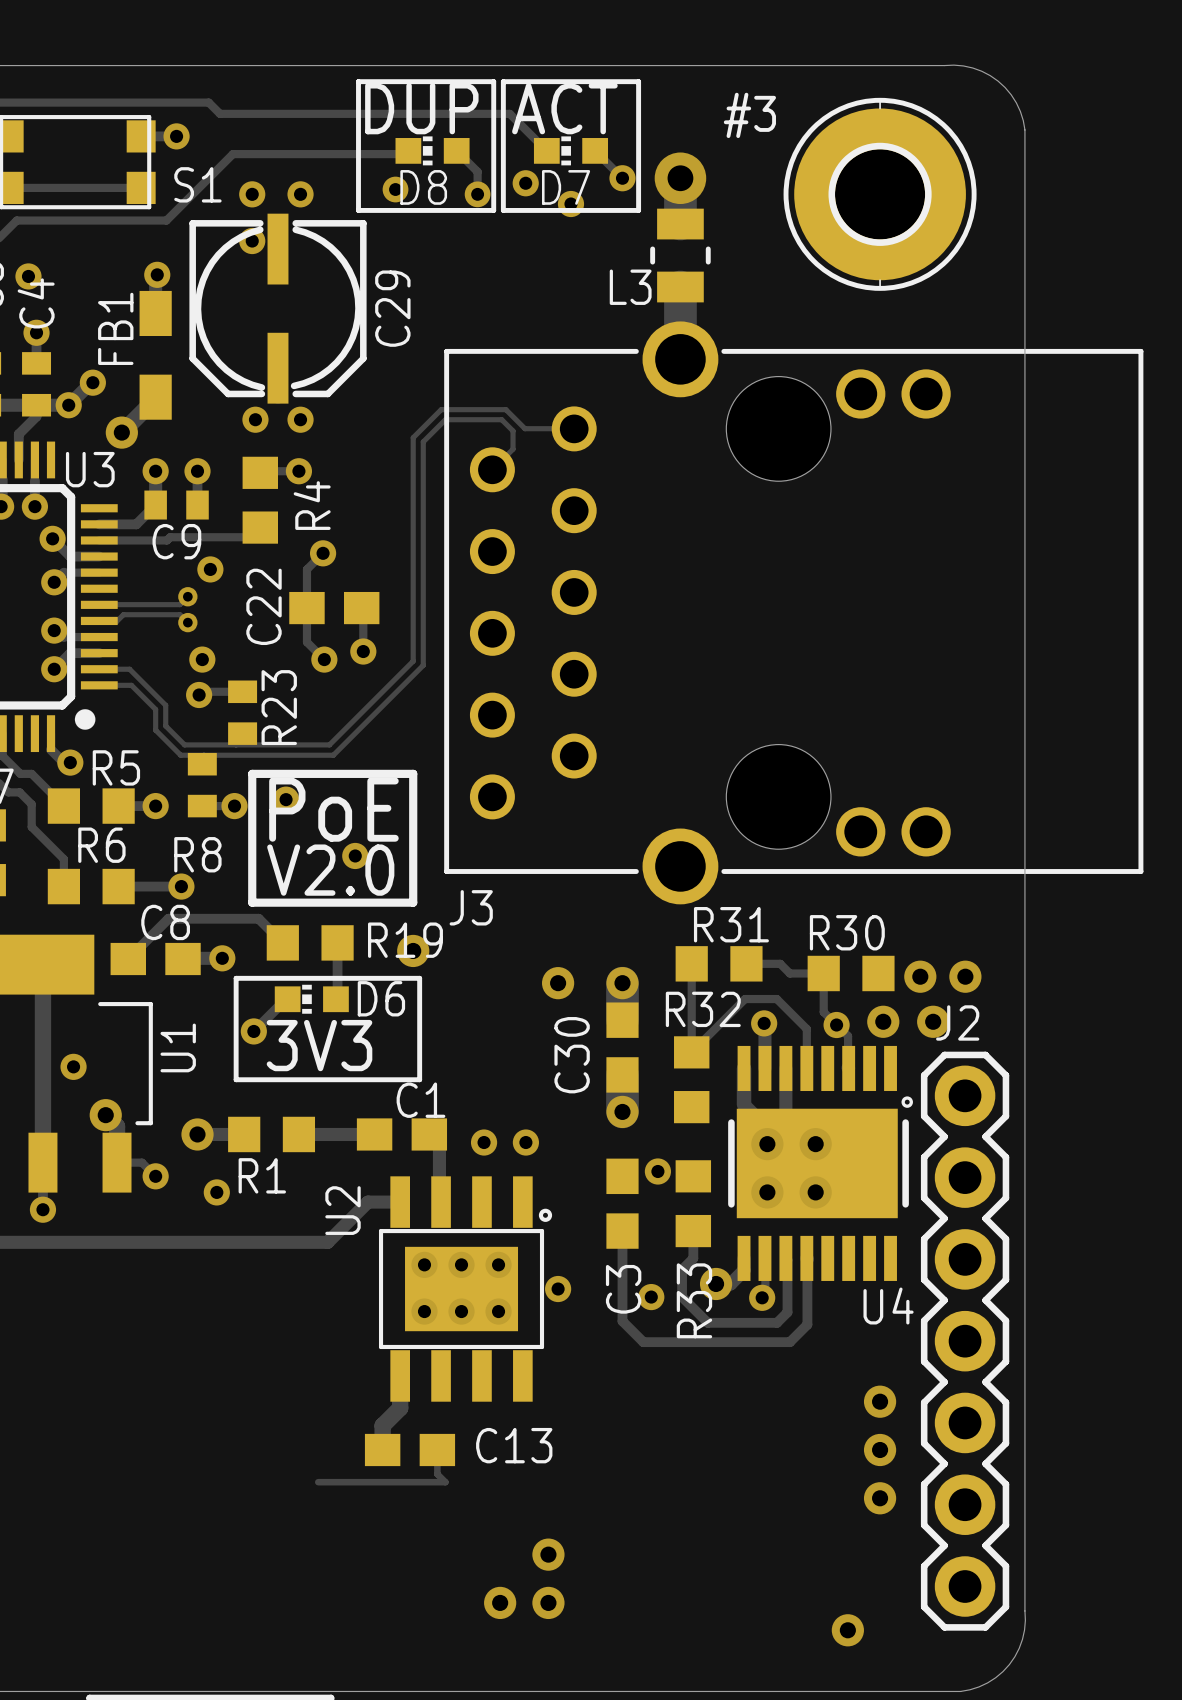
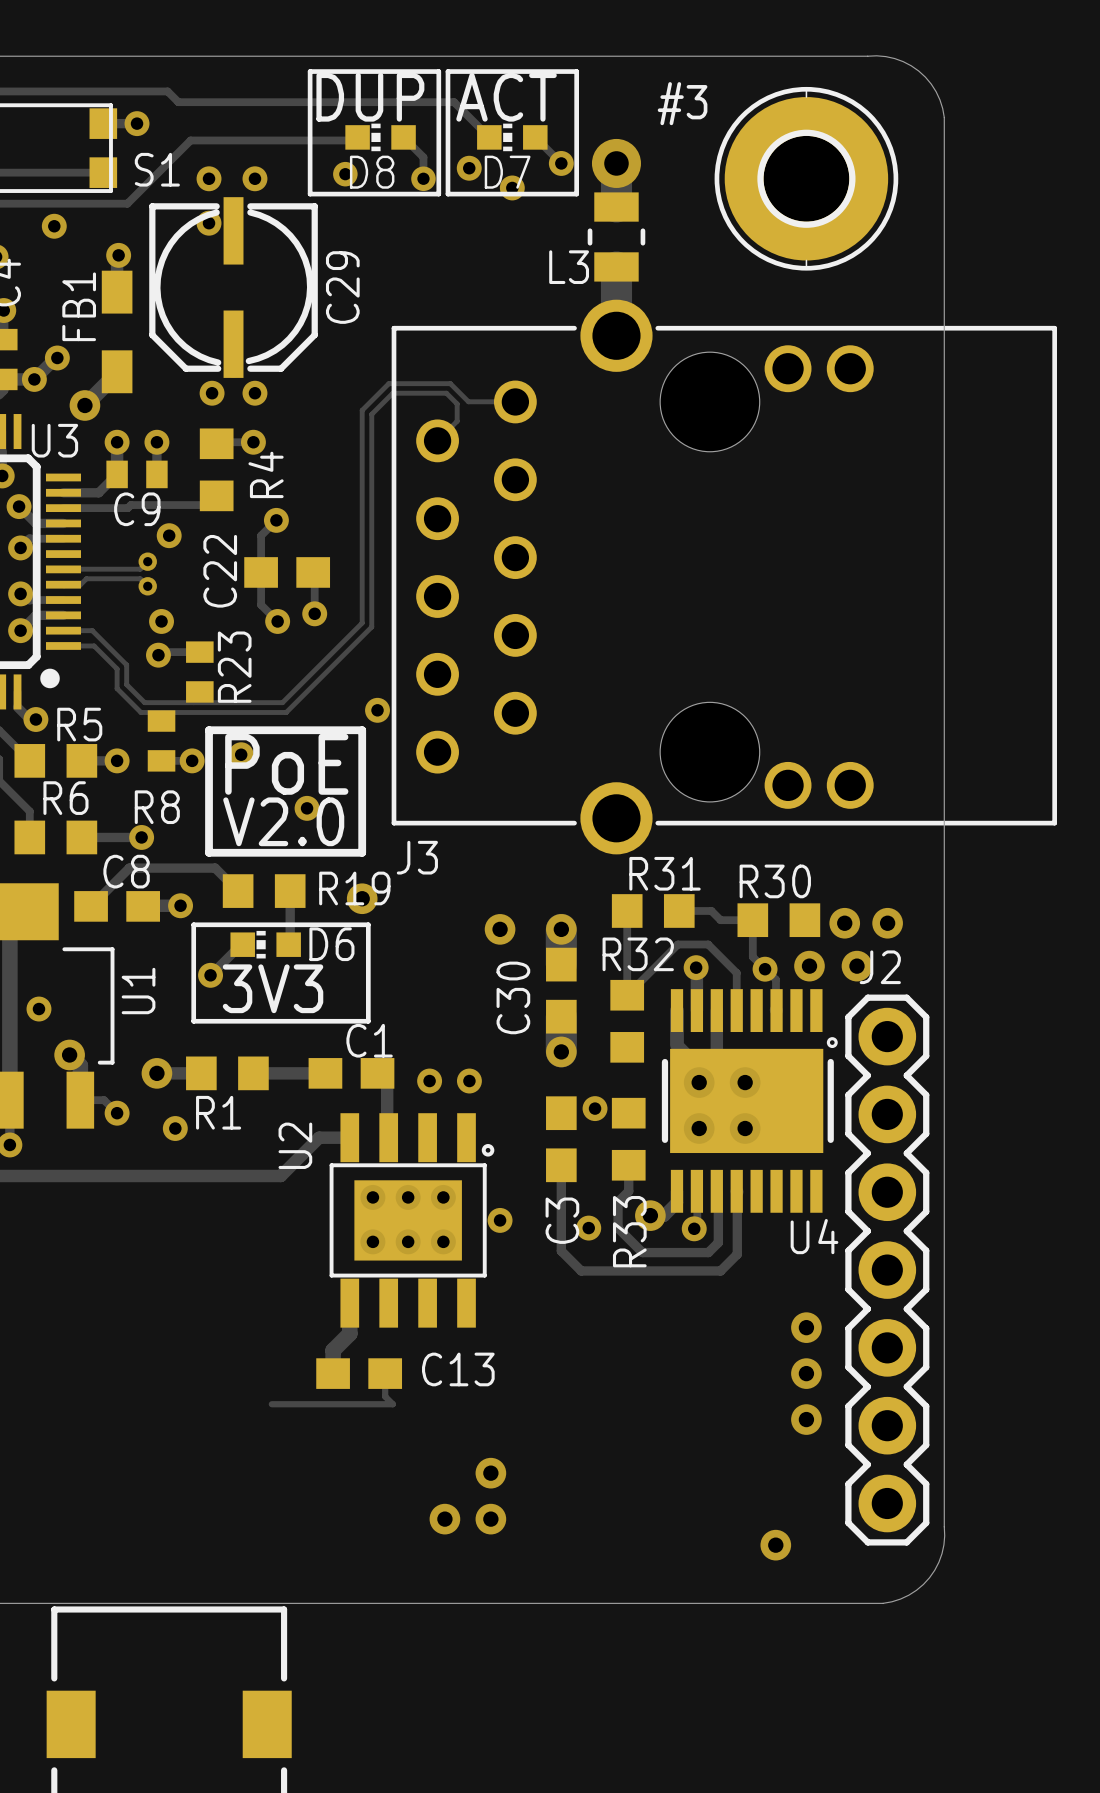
via: none -> (54, 226)
via: none -> (377, 710)

